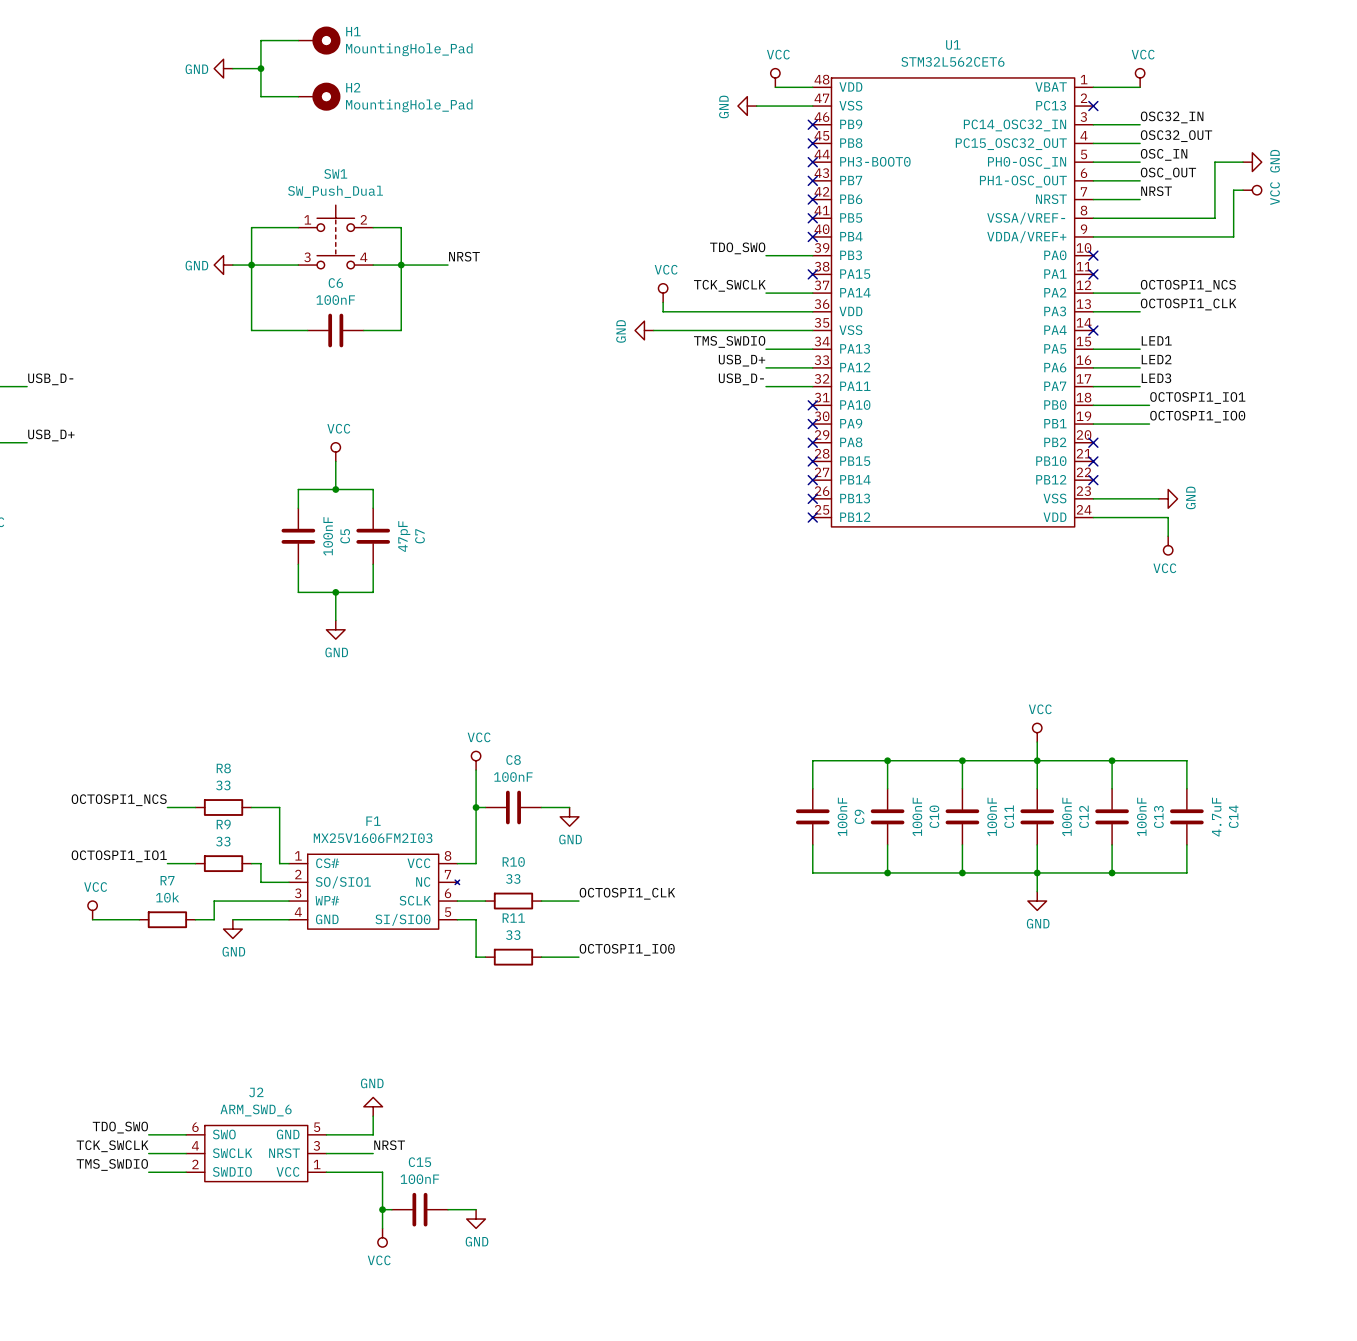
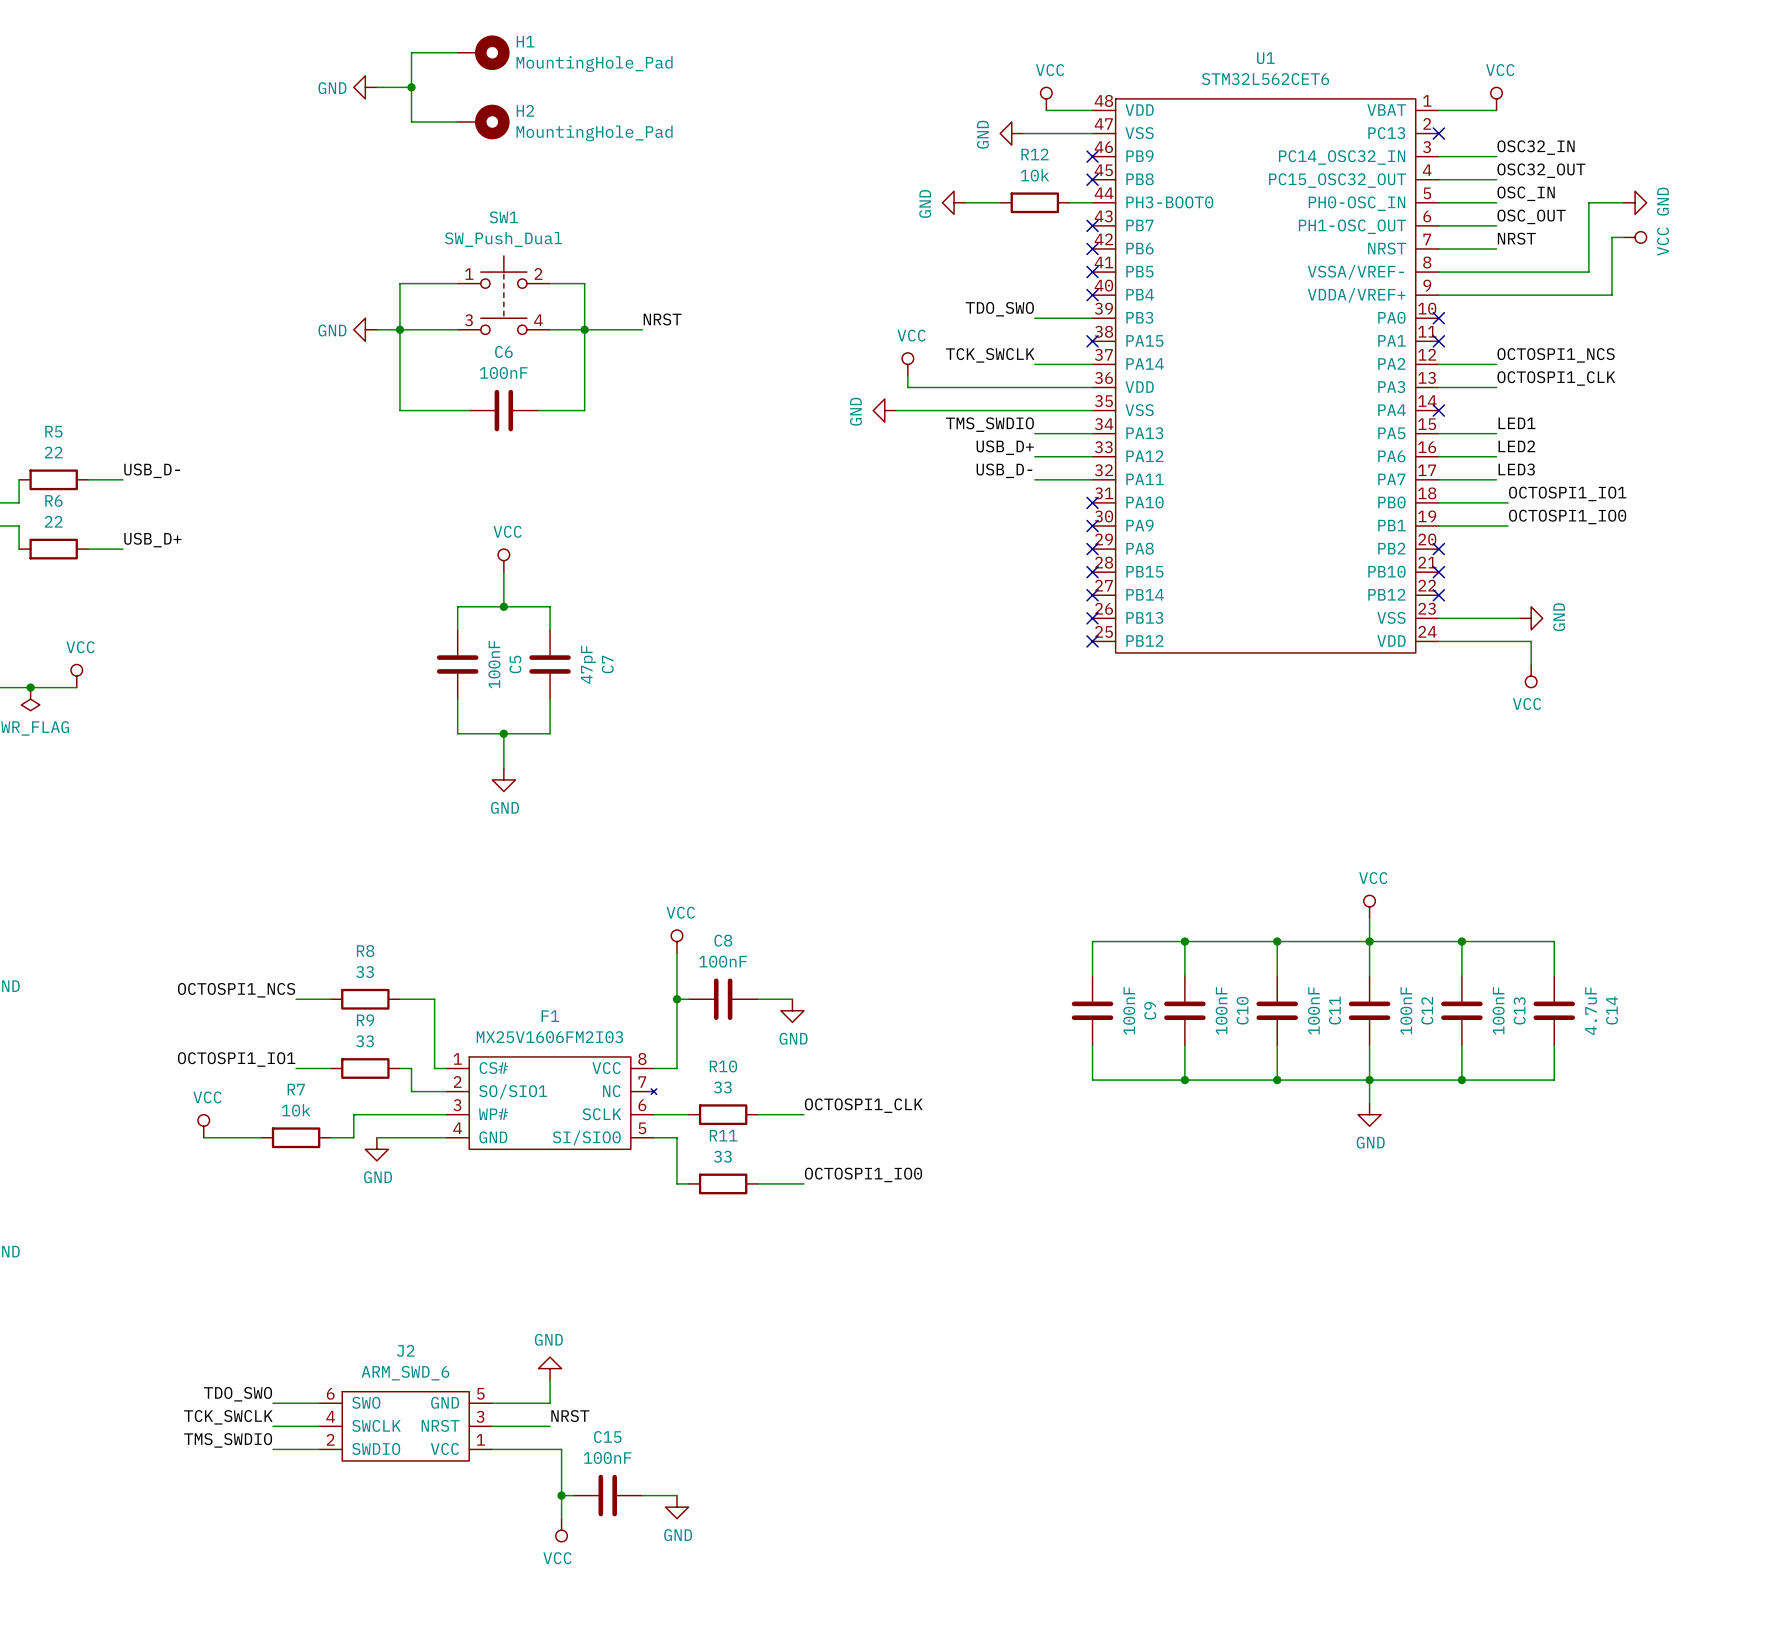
power symbol: none -> GND (954, 202)
wire: none -> (965, 202) (1000, 202)
R12: none -> 10k (1034, 202)
wire: none -> (1069, 202) (1092, 202)
no-connect mark: (812, 162) -> none

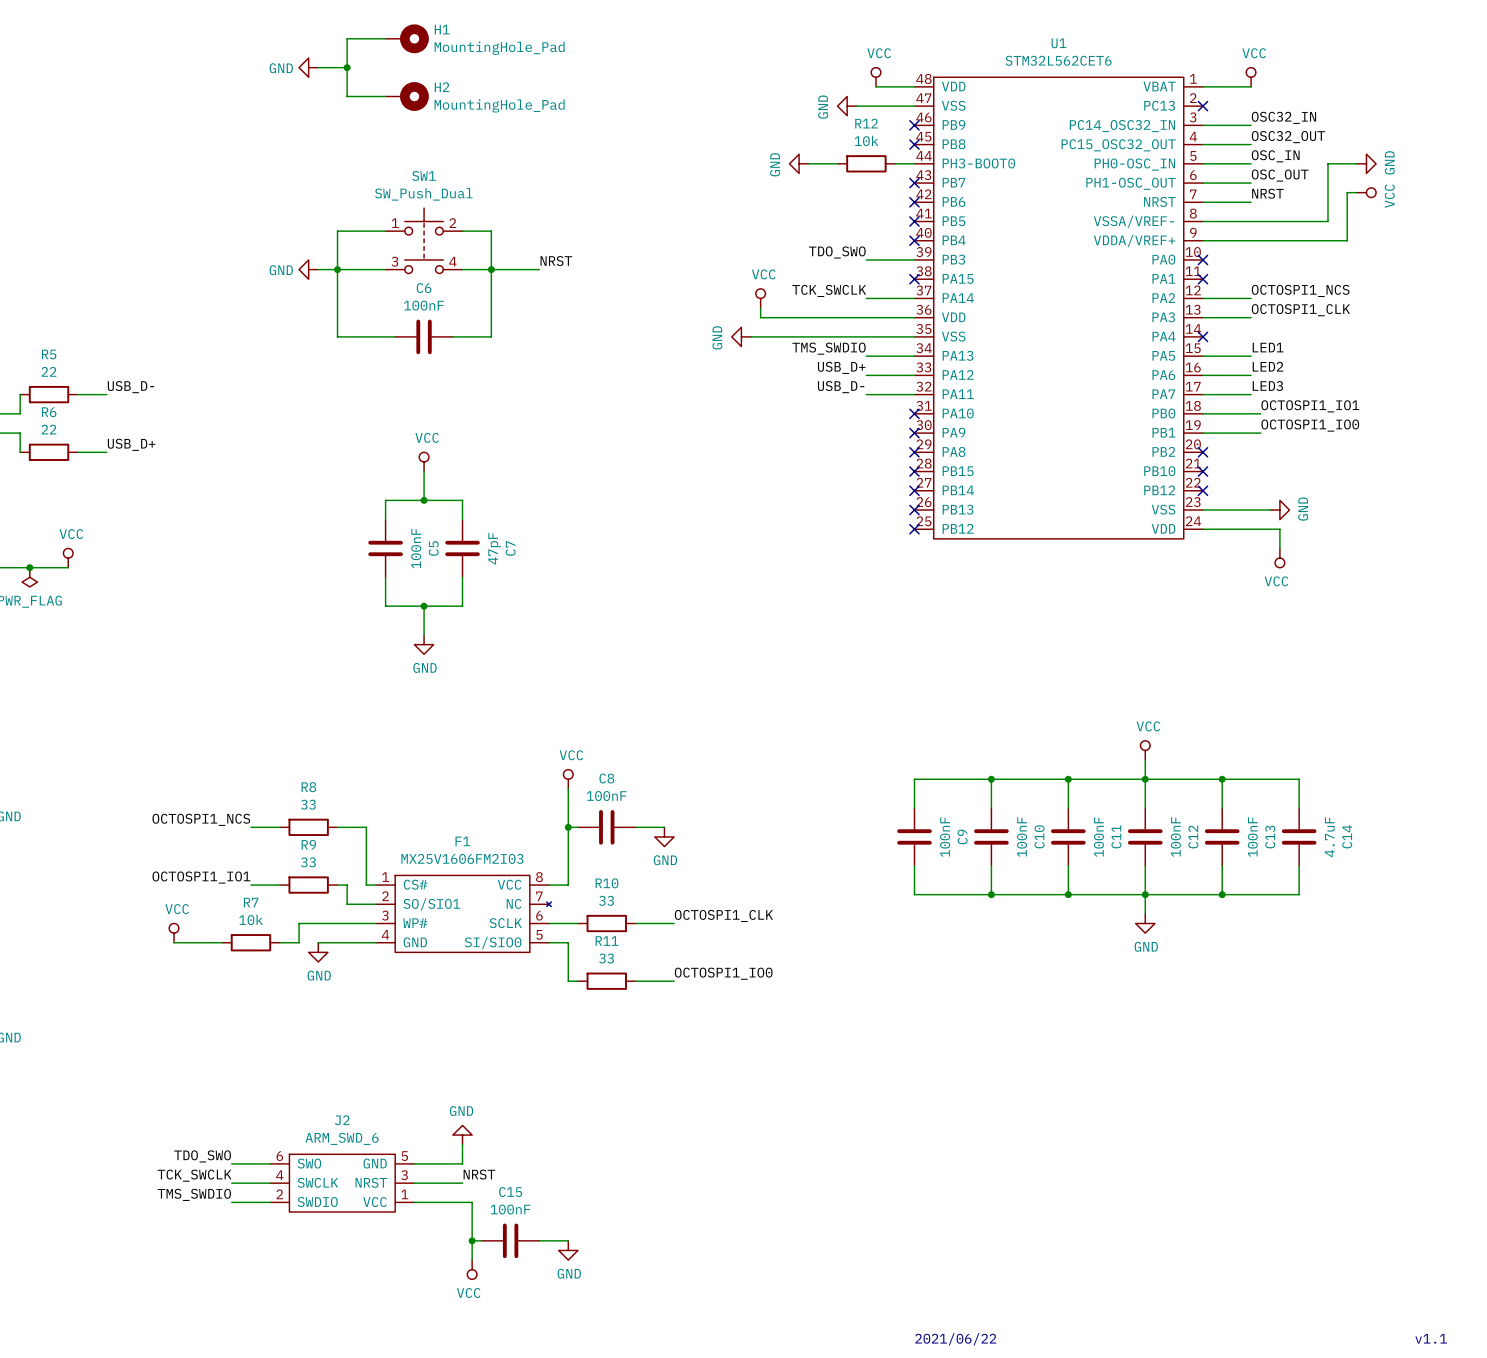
text: none -> 2021/06/22 (955, 1339)
text: none -> v1.1 (1431, 1338)

